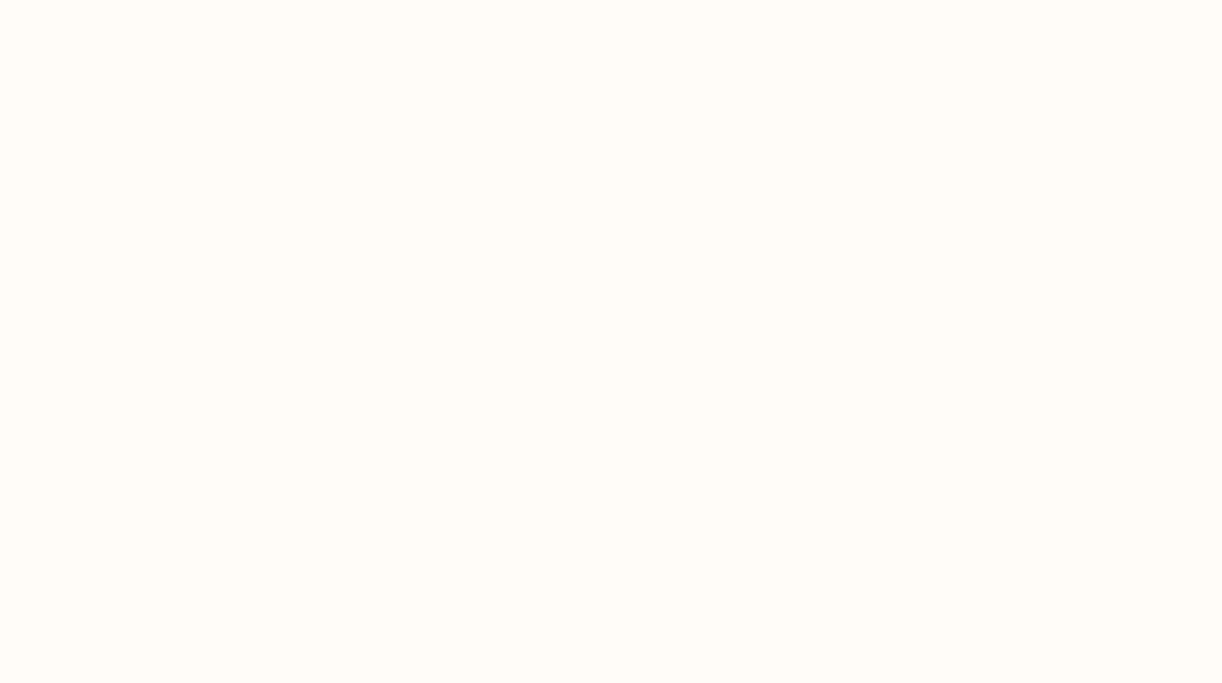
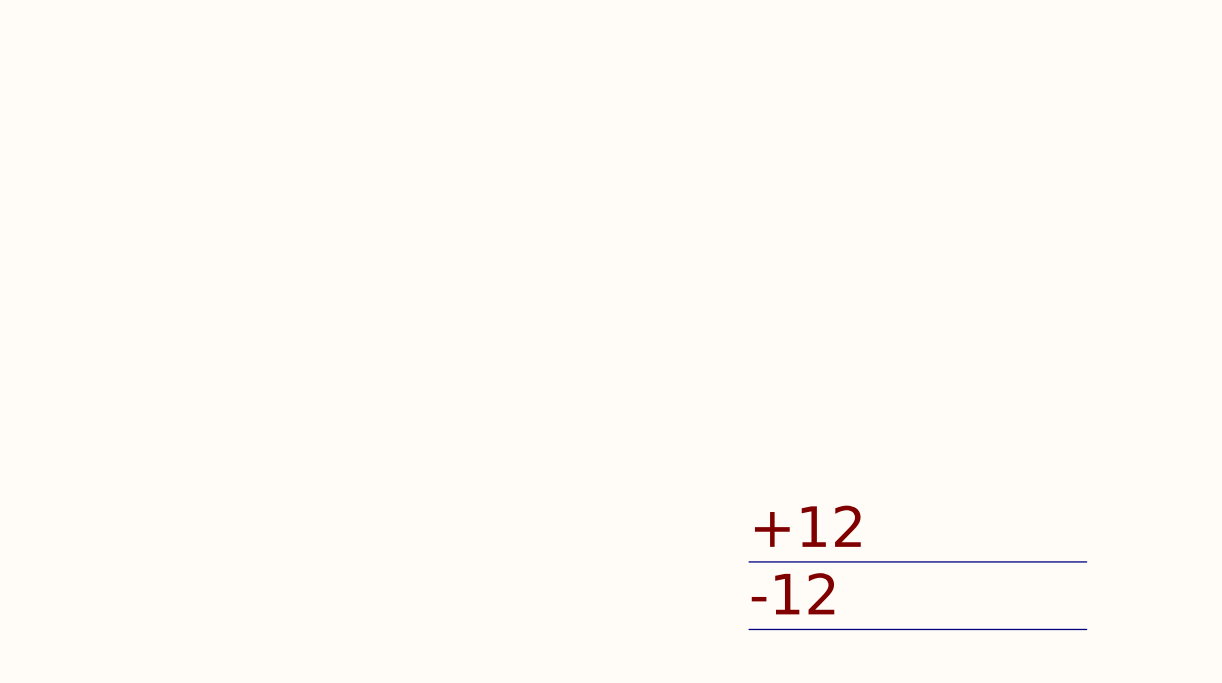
label: none -> +12 (807, 526)
wire: none -> (749, 561) (1086, 561)
label: none -> -12 (793, 593)
wire: none -> (749, 629) (1086, 629)

